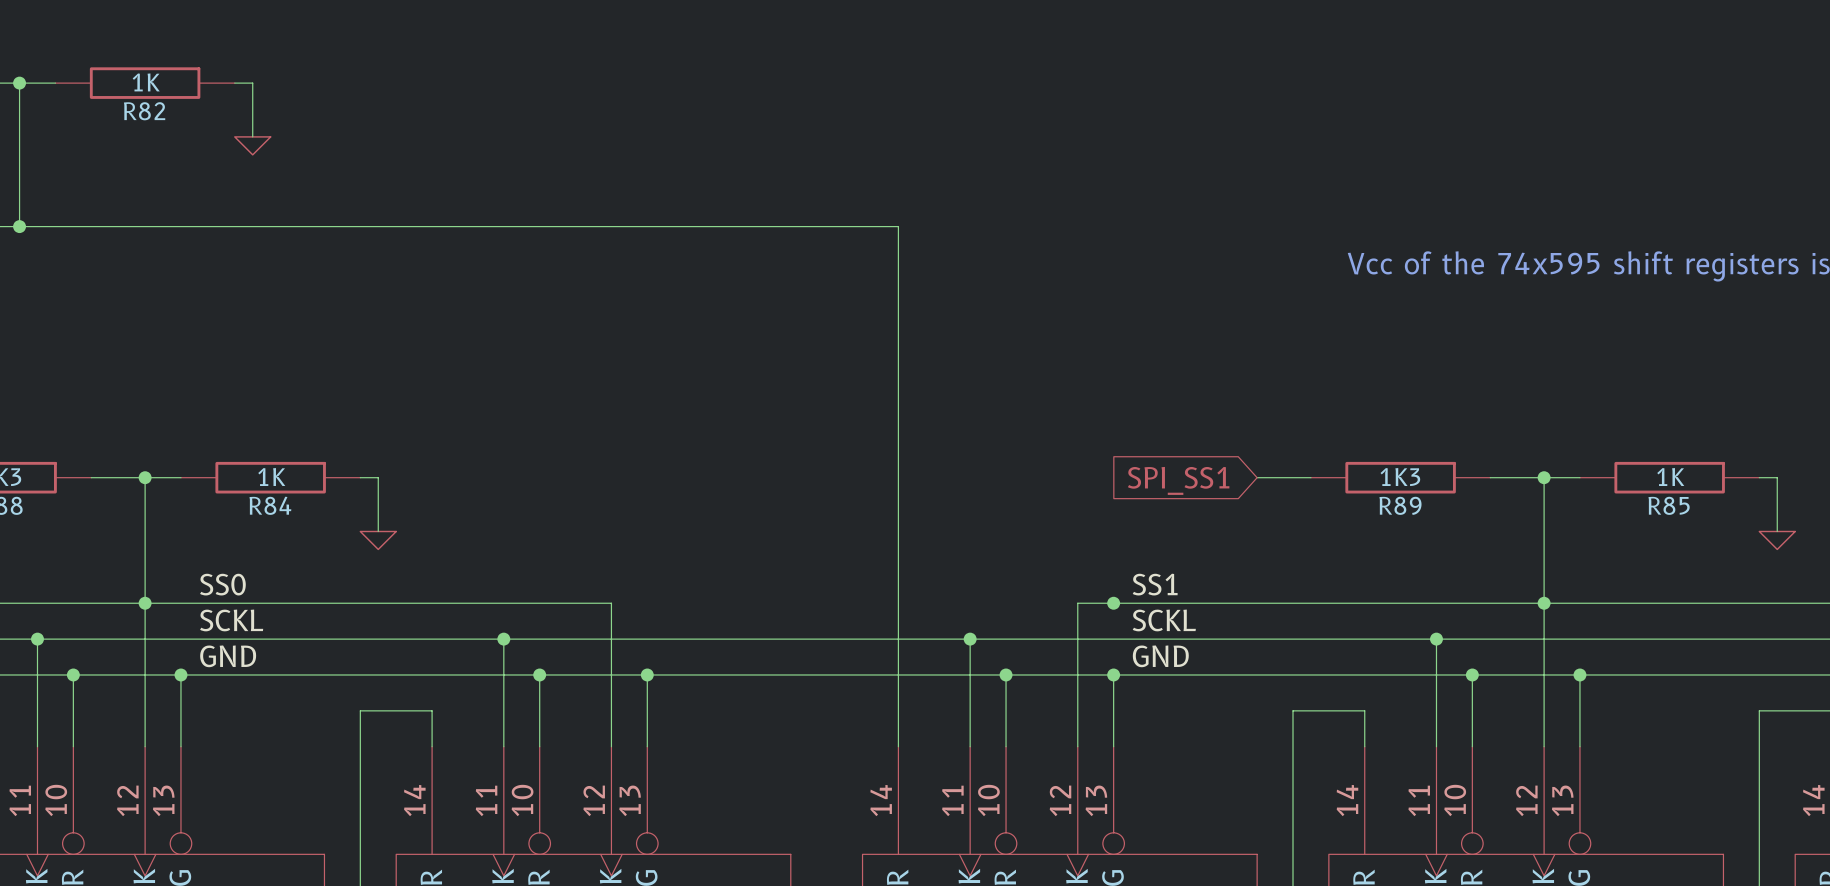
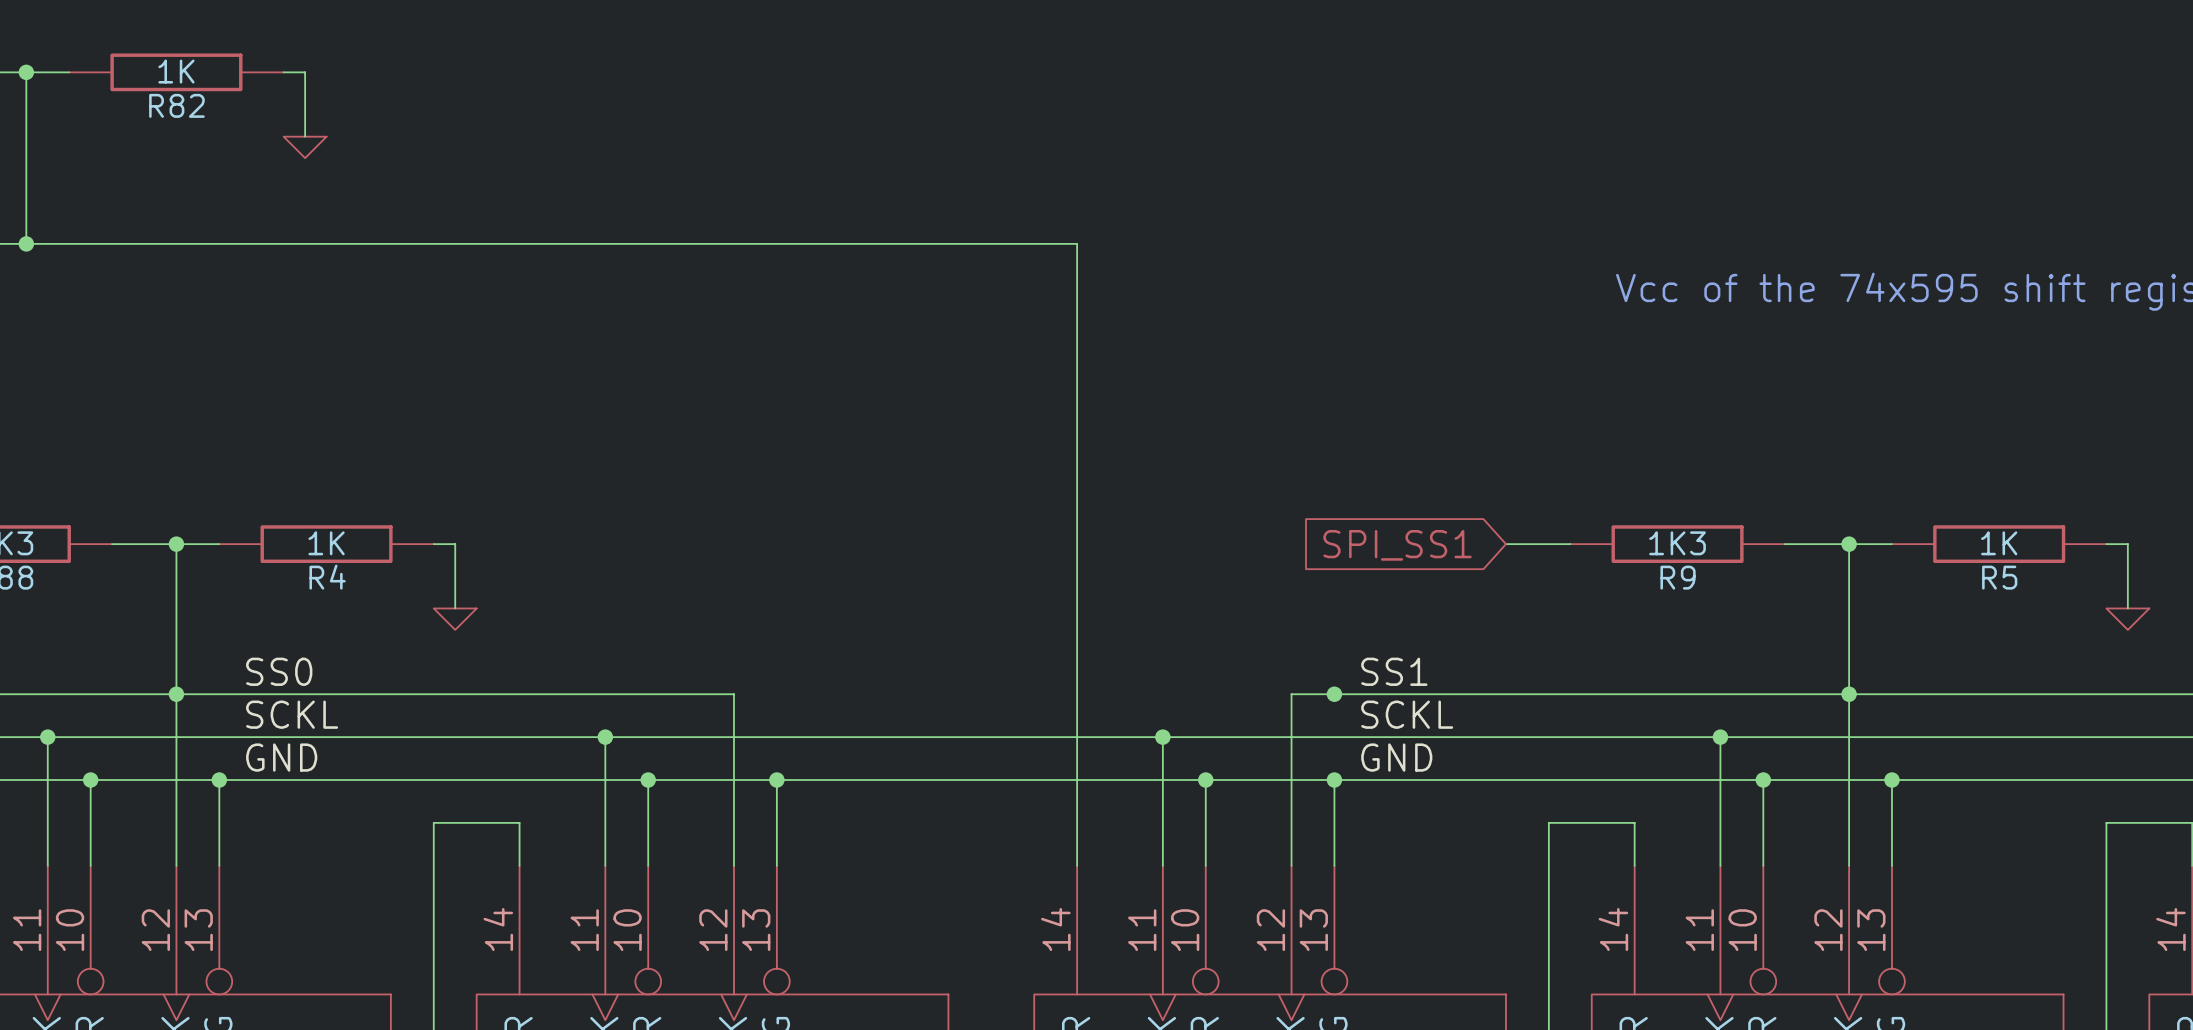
R84 name: R84 (270, 505) -> R4 (327, 577)
R89 name: R89 (1400, 505) -> R9 (1678, 577)
R85 name: R85 (1669, 505) -> R5 (1999, 577)

